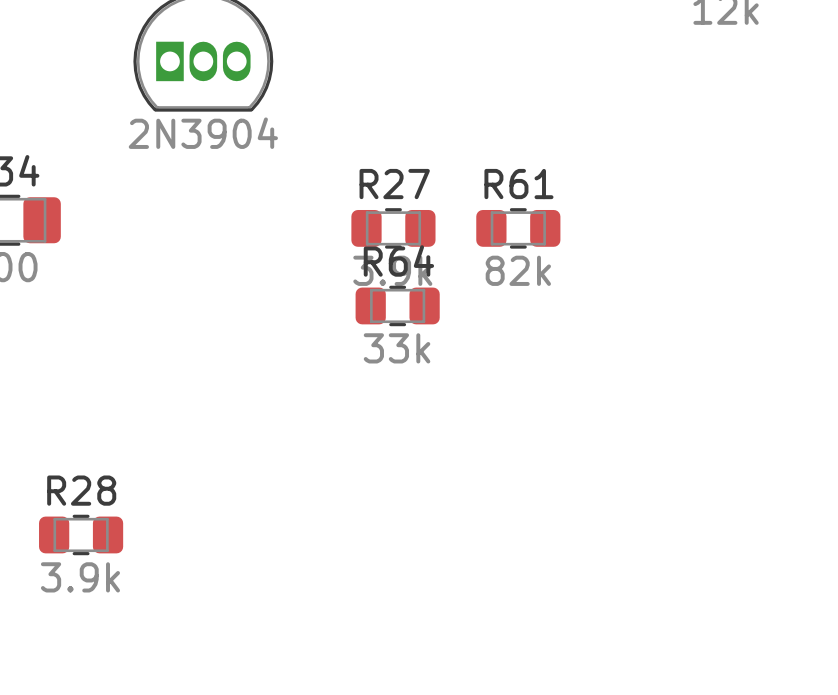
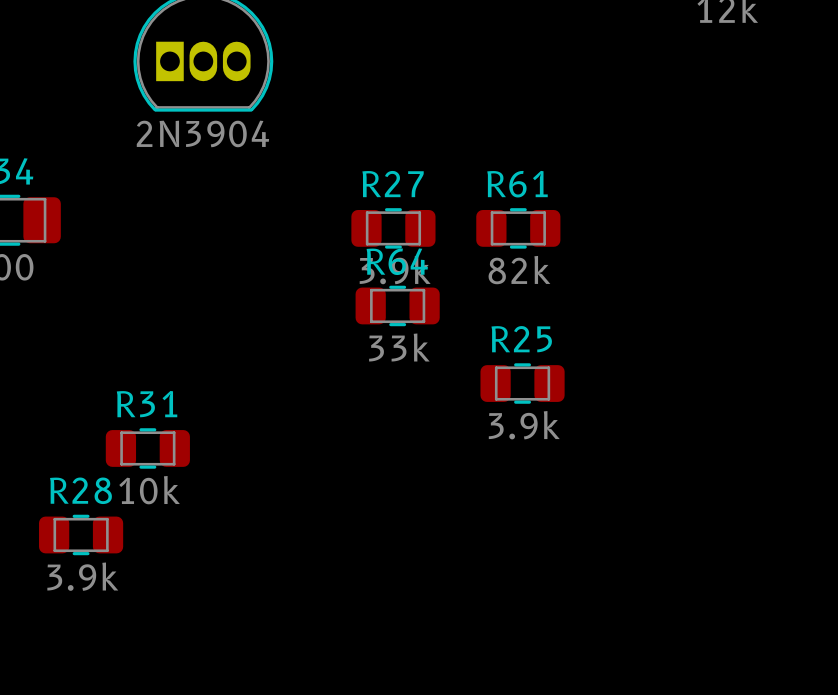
R25: none -> 3.9k (522, 383)
R31: none -> 10k (147, 448)

